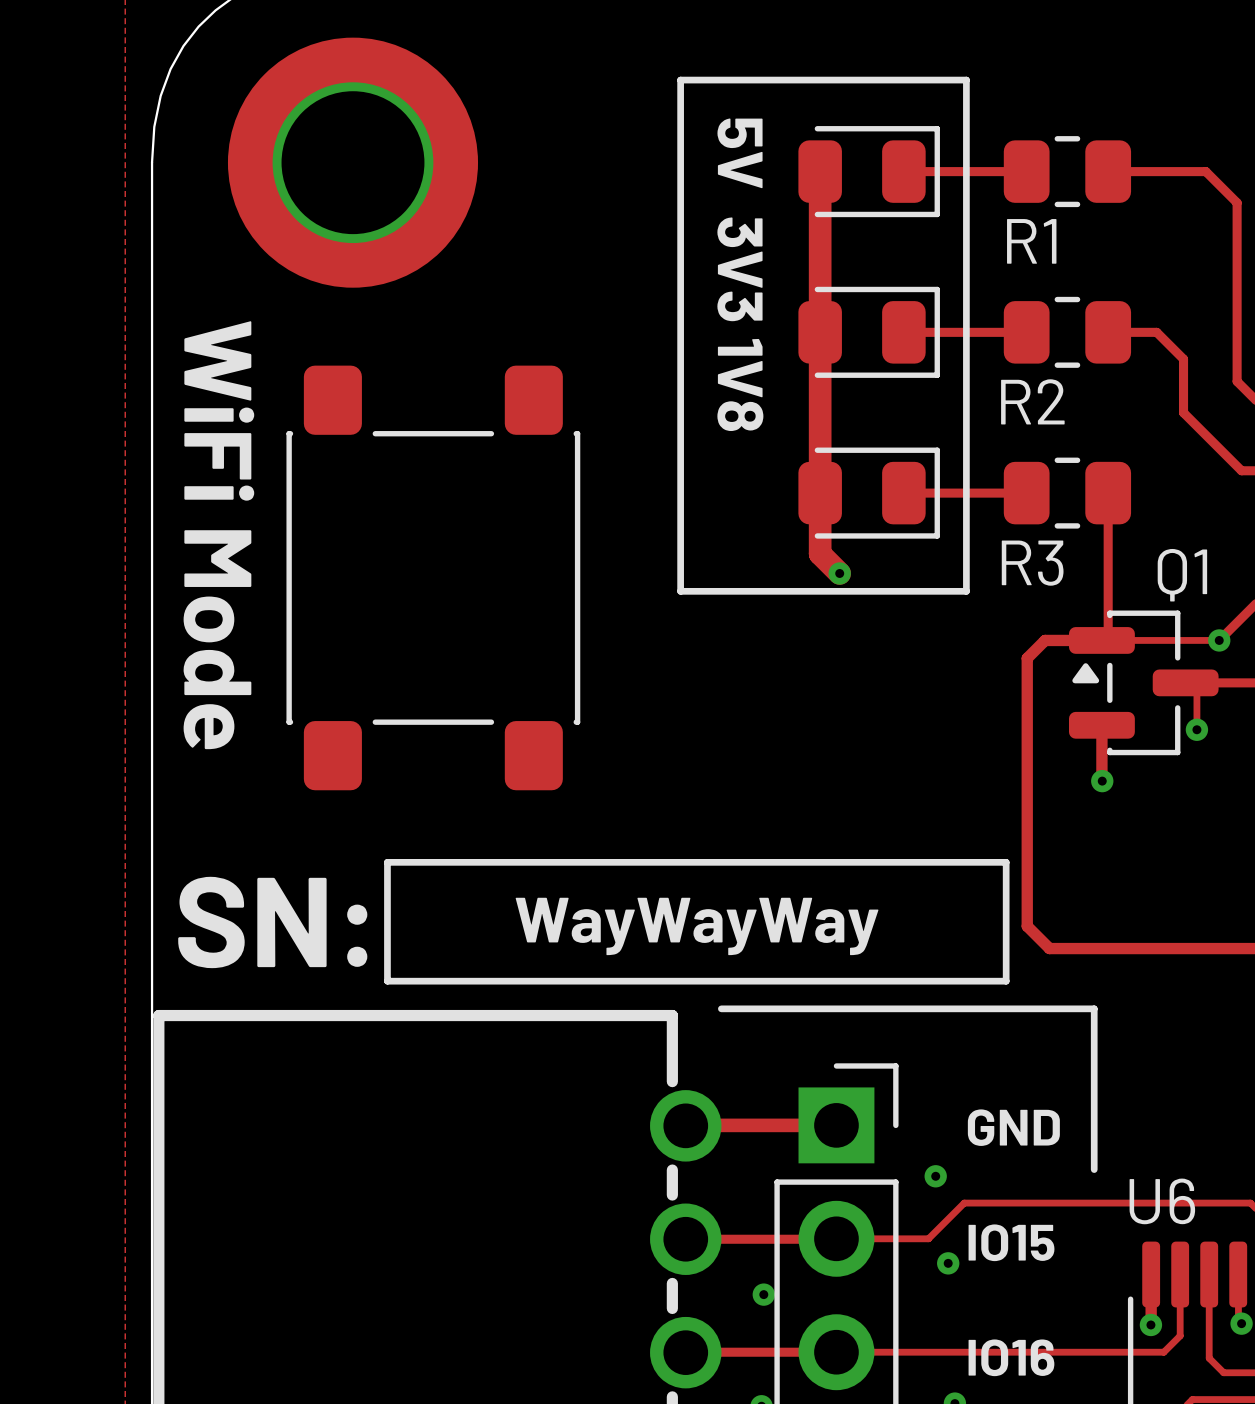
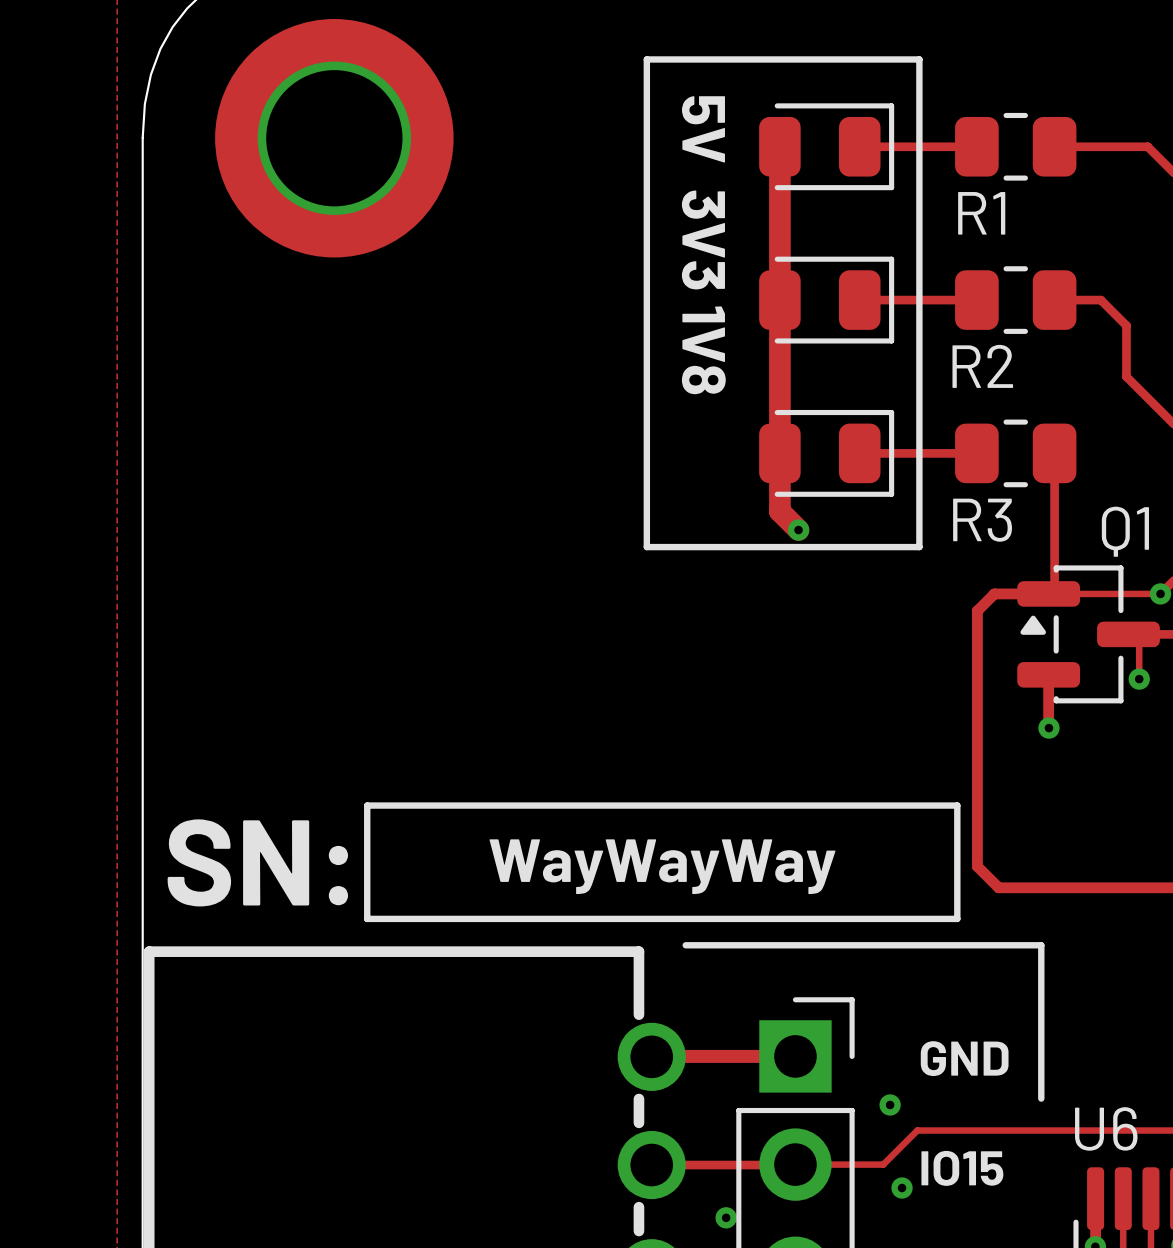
text: WiFi Mode (218, 535) -> none
part: (433, 577) -> none

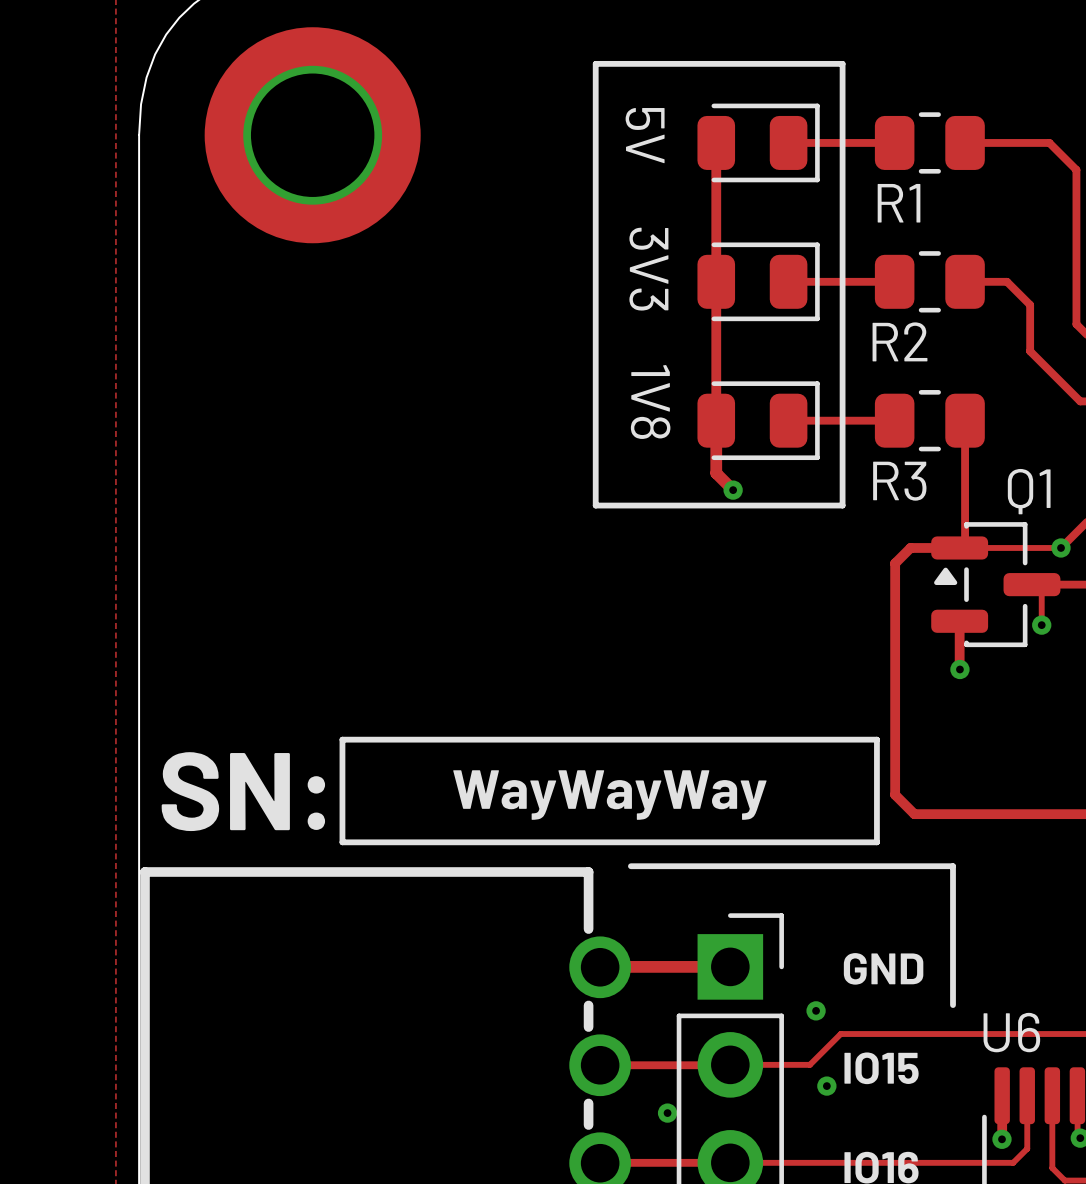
track width: thick (779, 146) (779, 511) (798, 530) -> thin (716, 142) (716, 473) (733, 490)
text: 5V 3V3 1V8 (703, 245) -> 5V (645, 135)
text: none -> 3V3 (648, 269)
text: none -> 1V8 (650, 402)

